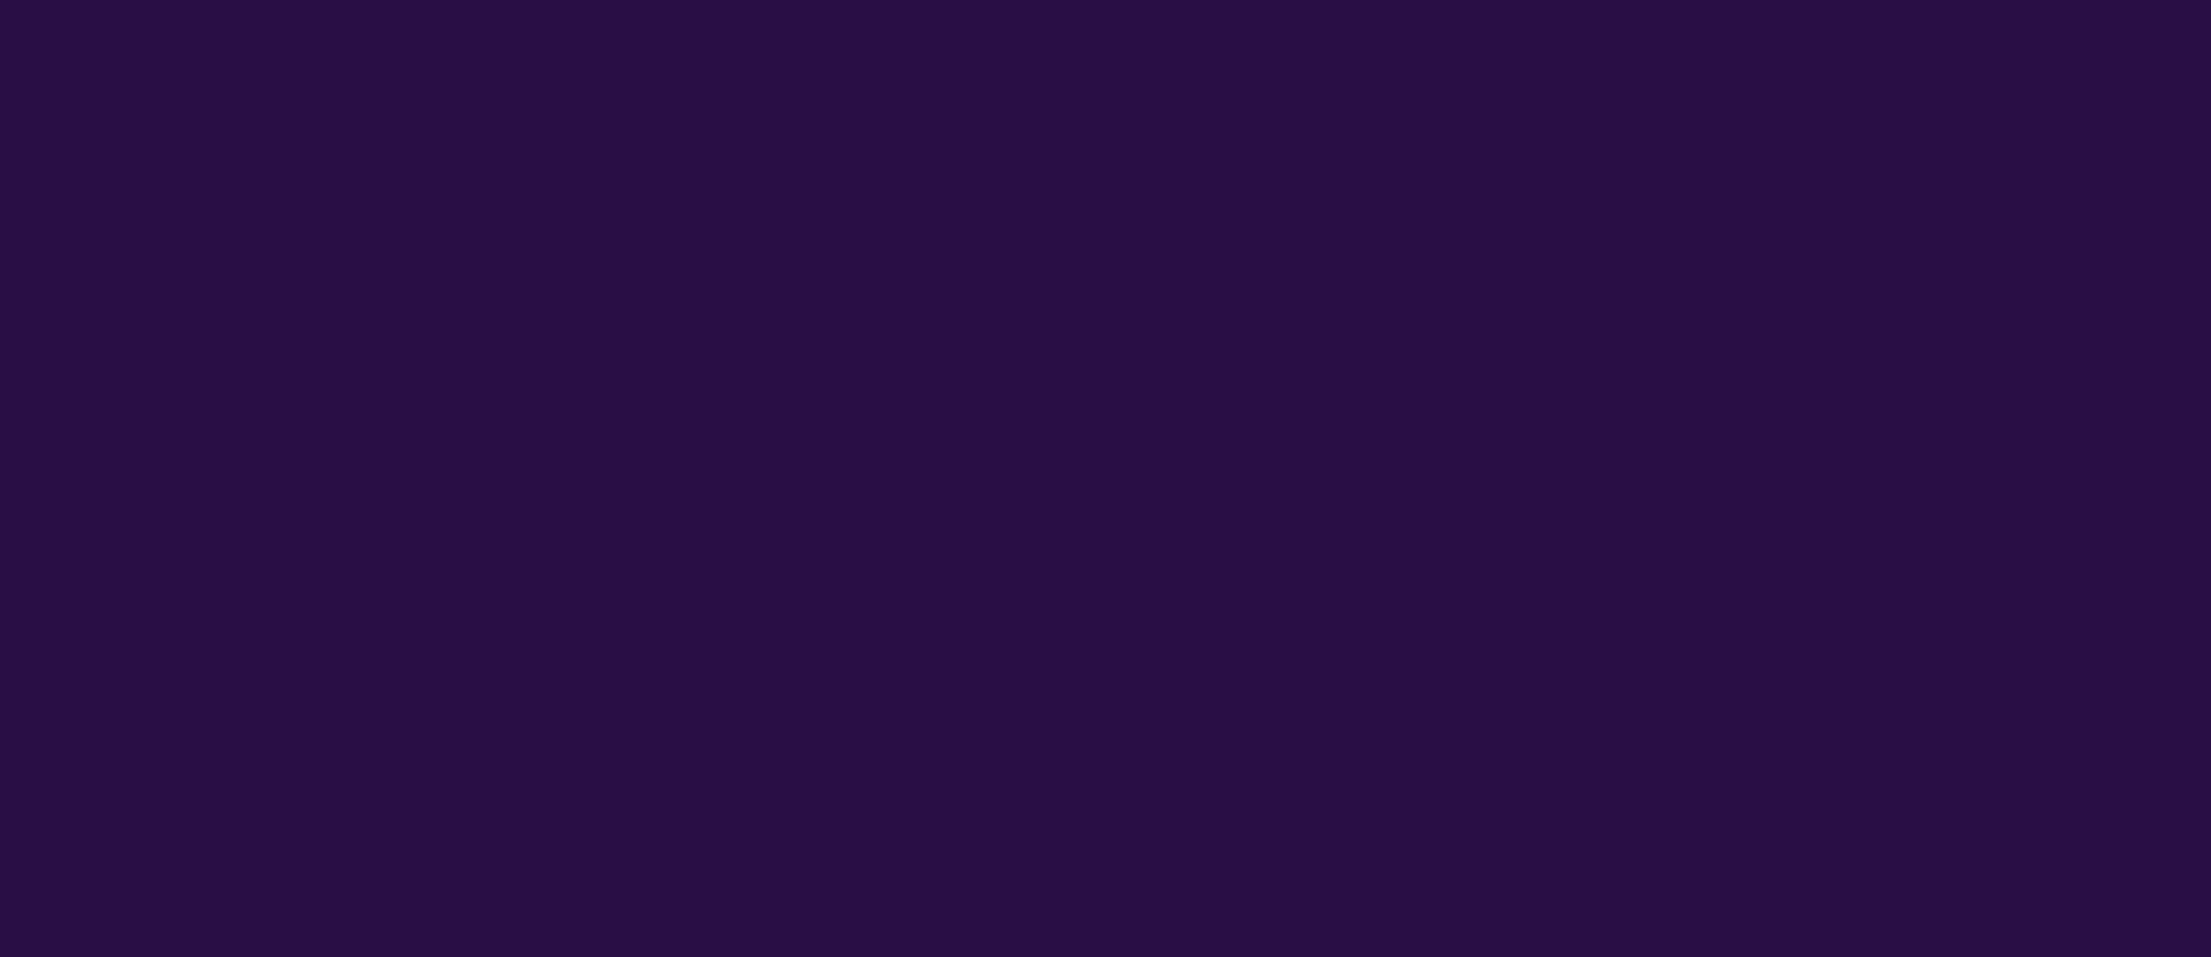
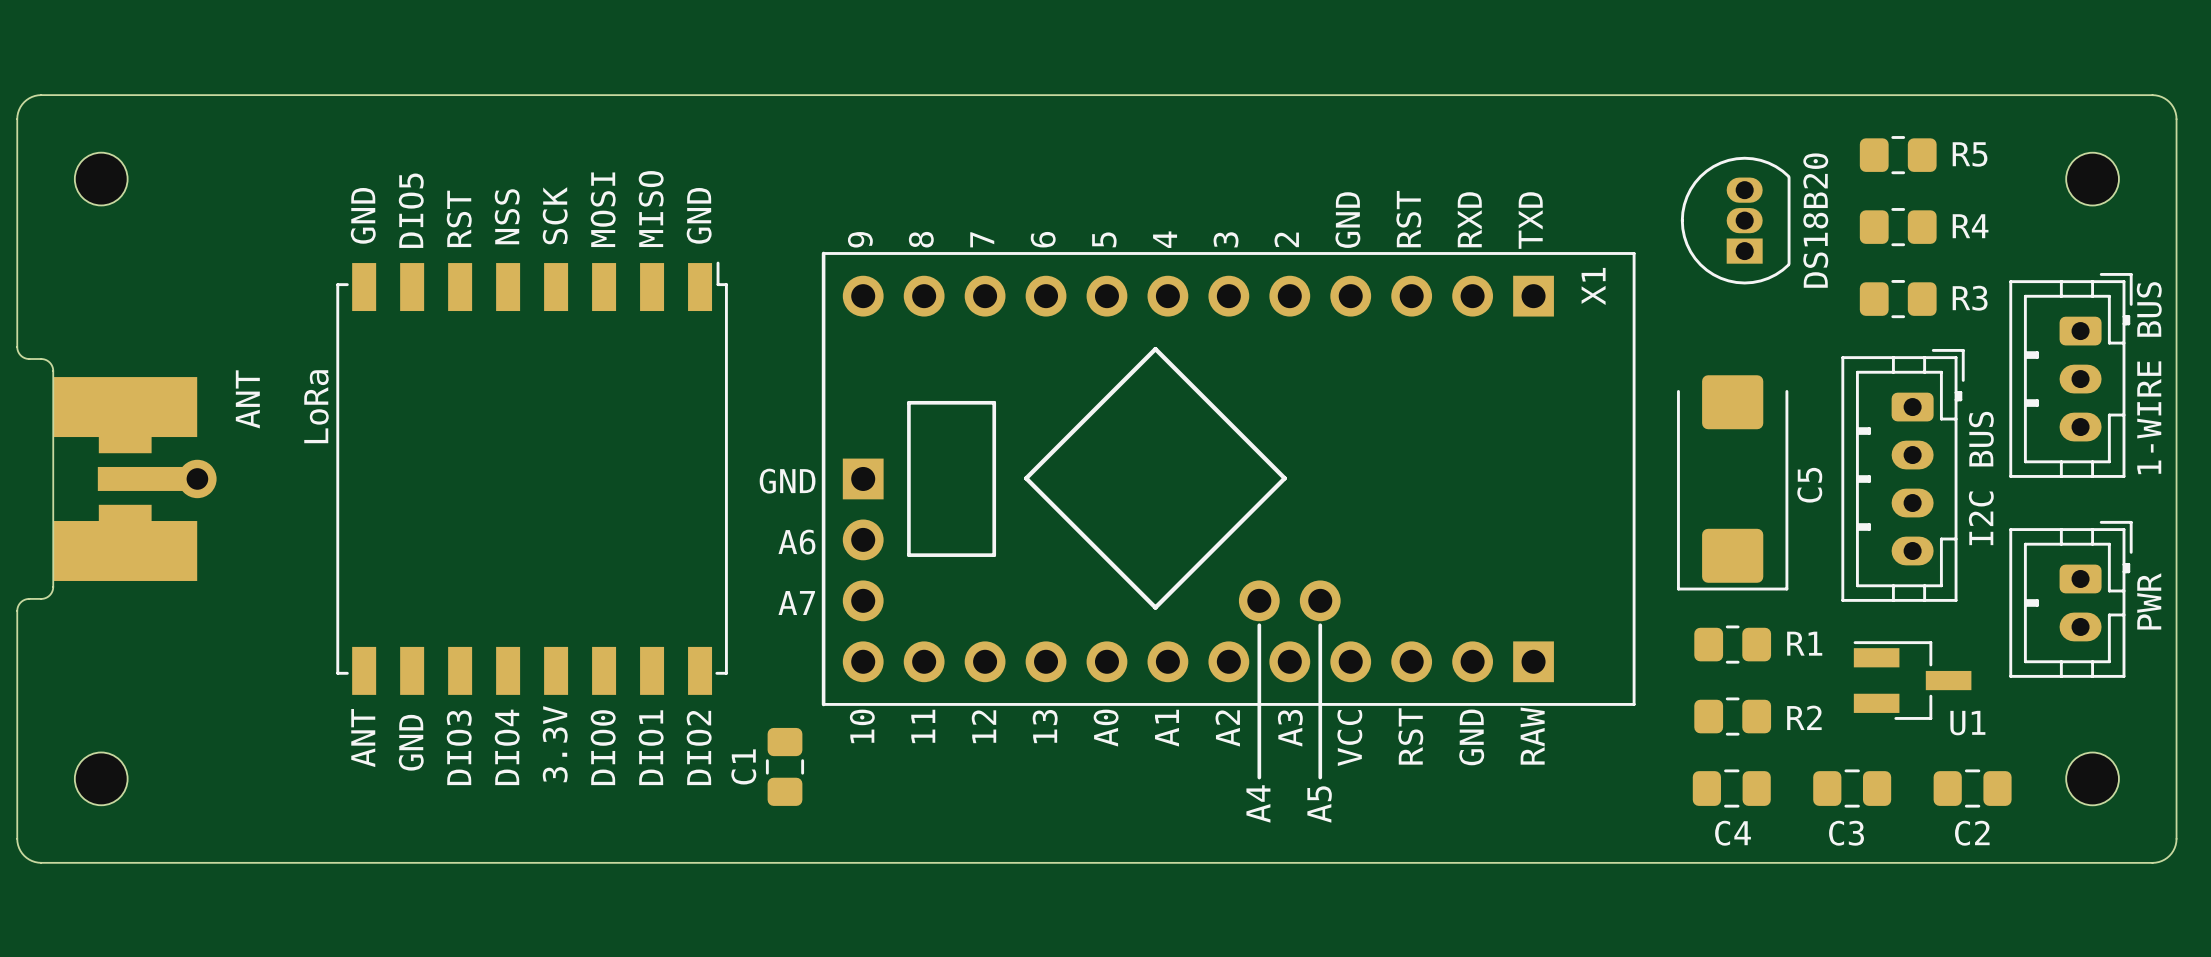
board edge: none -> (41, 95) (2152, 95) (2161, 96) (2171, 104) (2176, 119) (2176, 838) (2174, 848) (2167, 857) (2152, 862) (41, 862) (32, 861) (22, 853) (17, 838) (17, 610) (18, 604) (23, 600) (45, 598) (50, 594) (53, 588) (53, 371) (51, 365) (47, 360) (24, 358) (19, 354) (17, 348) (17, 119) (19, 109) (24, 102) (32, 96) (41, 95)
R5: none -> (1898, 155)
part: none -> (101, 179)
part: none -> (2092, 179)
DS18B20: none -> (1735, 220)
R4: none -> (1898, 227)
R3: none -> (1898, 299)
1-WIRE BUS: none -> (2070, 375)
I2C BUS: none -> (1903, 475)
LoRa: none -> (532, 478)
ANT: none -> (134, 479)
C5: none -> (1732, 482)
X1: none -> (1228, 515)
PWR: none -> (2070, 599)
R1: none -> (1732, 644)
U1: none -> (1912, 680)
R2: none -> (1732, 716)
C1: none -> (784, 766)
part: none -> (101, 778)
part: none -> (2092, 778)
C4: none -> (1731, 788)
C3: none -> (1852, 788)
C2: none -> (1972, 788)

